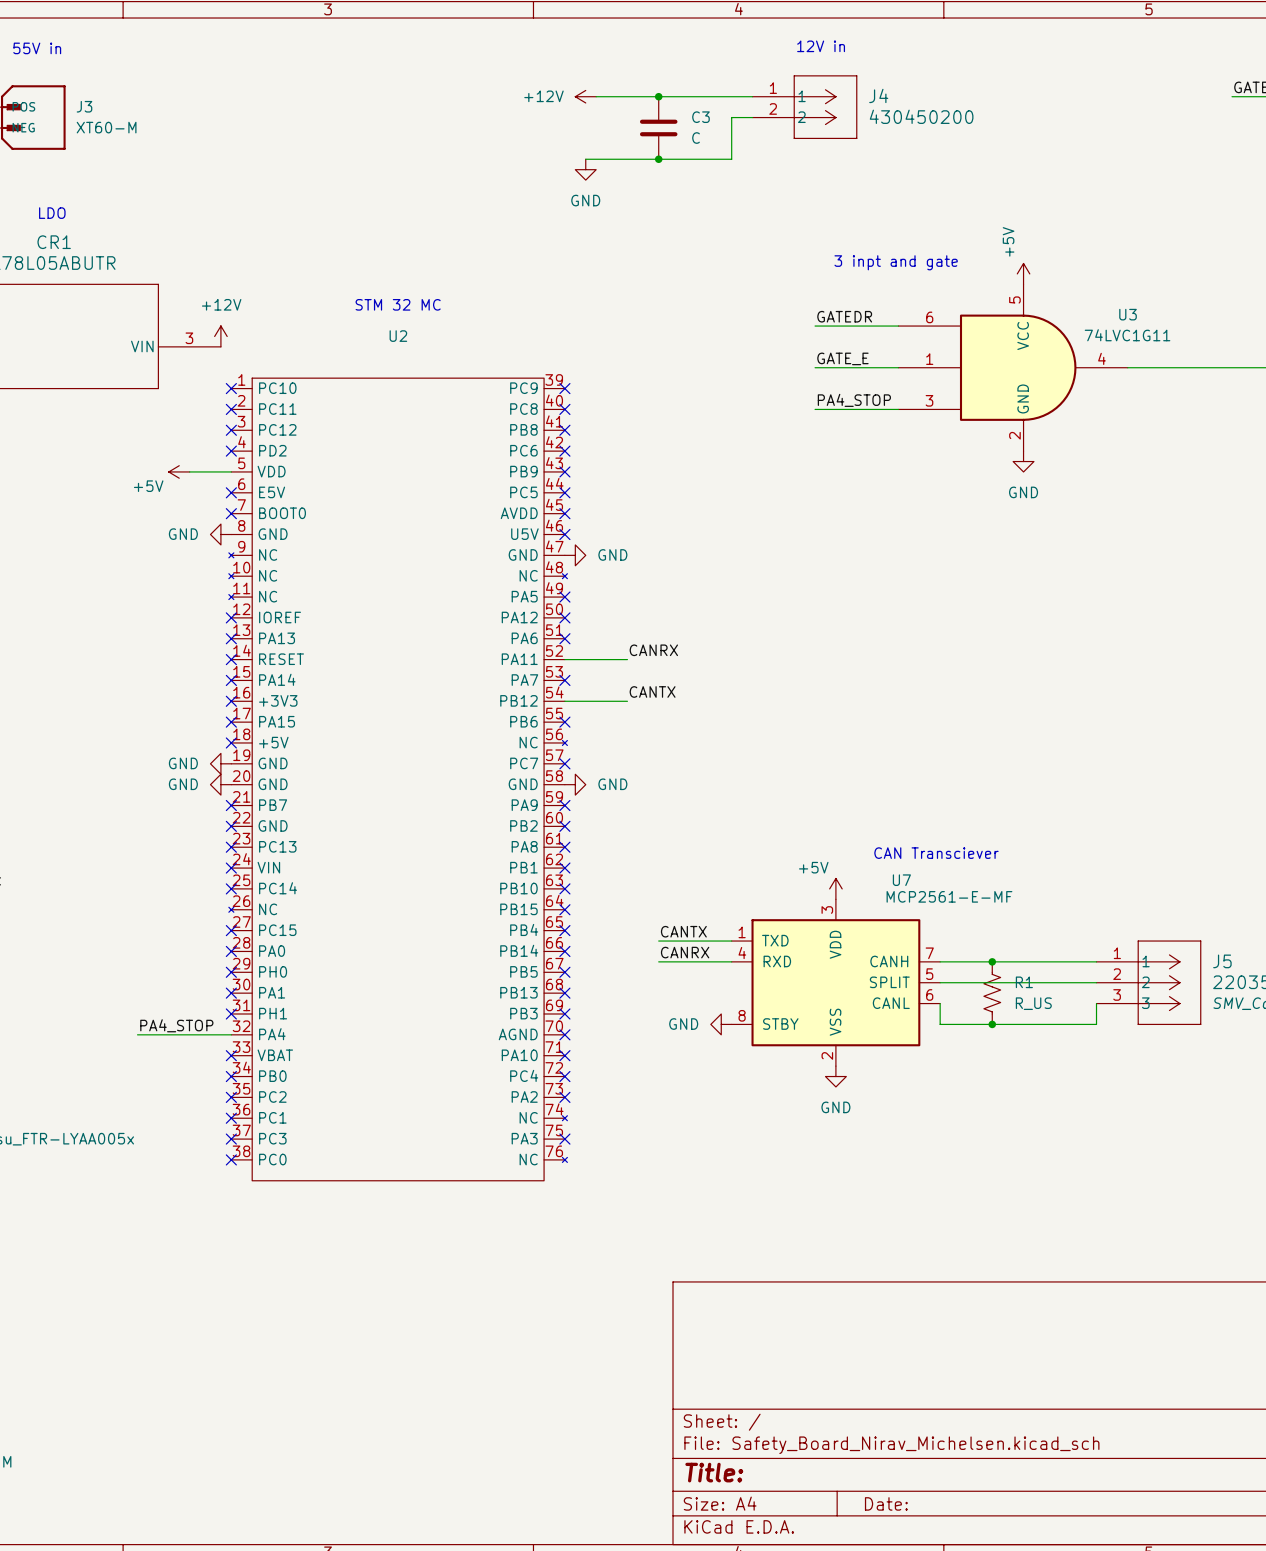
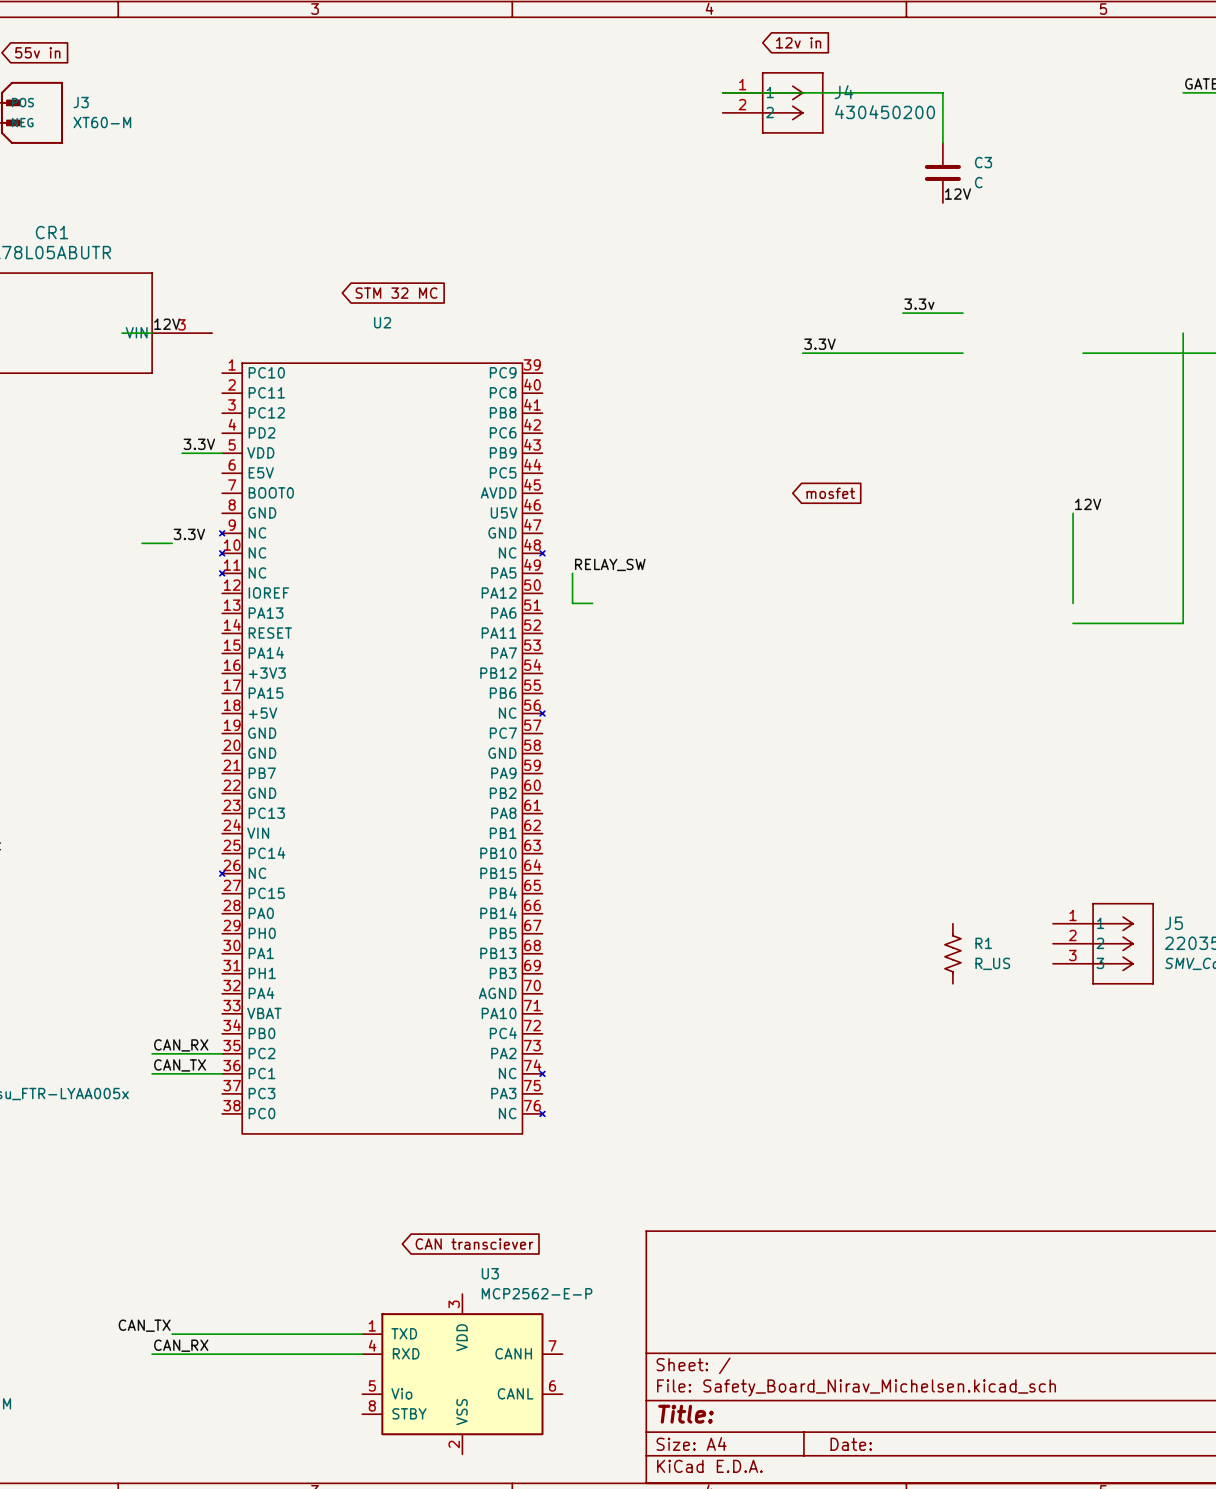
global label: none -> 12v in (798, 42)
text: 12V in (821, 46) -> none
text: 55V in (37, 48) -> none
global label: none -> 55v in (37, 52)
power symbol: +12V (585, 96) -> none
wire: (596, 96) (752, 96) -> (942, 142) (942, 92) (722, 92)
junction: (658, 96) -> none
wire: (752, 117) (731, 117) (731, 159) (585, 159) -> none
C3 position: (658, 127) -> (942, 172)
junction: (658, 159) -> none
power symbol: GND (585, 169) -> none
label: none -> 12V (958, 194)
text: LDO (52, 213) -> none
text: 3 inpt and gate (896, 262) -> none
power symbol: +5V (1023, 273) -> none
U3 symbol: [898, 284, 1128, 452] -> [362, 1294, 563, 1455]
text: STM 32 MC (398, 304) -> none
global label: none -> STM 32 MC (396, 293)
U3 name position: U3 (1128, 314) -> U3 (490, 1273)
label: GATEDR (844, 316) -> none
label: none -> 3.3v (919, 304)
wire: (815, 326) (898, 326) -> none
U3 value: 74LVC1G11 (1127, 335) -> MCP2562-E-P (537, 1293)
power symbol: +12V (220, 336) -> none
label: none -> 12V (167, 324)
wire: none -> (122, 333) (152, 333)
wire: none -> (1183, 333) (1183, 623) (1073, 623)
label: GATE_E (842, 358) -> none
label: none -> 3.3V (820, 344)
wire: (815, 367) (835, 367) -> none
no-connect mark: (231, 388) -> none
no-connect mark: (564, 388) -> none
label: PA4_STOP (854, 400) -> none
no-connect mark: (231, 409) -> none
no-connect mark: (564, 409) -> none
wire: (815, 409) (898, 409) -> none
no-connect mark: (231, 430) -> none
no-connect mark: (564, 430) -> none
no-connect mark: (231, 451) -> none
no-connect mark: (564, 451) -> none
power symbol: GND (1023, 461) -> none
label: none -> 3.3V (199, 444)
power symbol: +5V (179, 471) -> none
no-connect mark: (564, 471) -> none
no-connect mark: (231, 492) -> none
no-connect mark: (564, 492) -> none
no-connect mark: (231, 513) -> none
no-connect mark: (564, 513) -> none
global label: none -> mosfet (830, 493)
label: none -> 12V (1088, 504)
power symbol: GND (220, 534) -> none
no-connect mark: (564, 534) -> none
wire: none -> (1073, 513) (1073, 603)
power symbol: GND (575, 555) -> none
label: none -> 3.3V (189, 534)
wire: none -> (142, 543) (172, 543)
label: none -> RELAY_SW (610, 564)
no-connect mark: (564, 597) -> none
wire: none -> (572, 573) (572, 603) (592, 603)
no-connect mark: (231, 617) -> none
no-connect mark: (564, 617) -> none
no-connect mark: (231, 638) -> none
no-connect mark: (564, 638) -> none
label: CANRX (653, 650) -> none
no-connect mark: (231, 659) -> none
wire: (564, 659) (627, 659) -> none
no-connect mark: (231, 680) -> none
no-connect mark: (564, 680) -> none
label: CANTX (652, 691) -> none
no-connect mark: (231, 701) -> none
wire: (564, 701) (627, 701) -> none
no-connect mark: (231, 722) -> none
no-connect mark: (564, 722) -> none
no-connect mark: (231, 742) -> none
power symbol: GND (220, 763) -> none
no-connect mark: (564, 763) -> none
power symbol: GND (220, 784) -> none
power symbol: GND (575, 784) -> none
no-connect mark: (231, 805) -> none
no-connect mark: (564, 805) -> none
no-connect mark: (231, 826) -> none
no-connect mark: (564, 826) -> none
no-connect mark: (231, 847) -> none
no-connect mark: (564, 847) -> none
text: CAN Transciever (936, 853) -> none
no-connect mark: (231, 868) -> none
no-connect mark: (564, 868) -> none
no-connect mark: (231, 888) -> none
no-connect mark: (564, 888) -> none
power symbol: +5V (835, 888) -> none
no-connect mark: (564, 909) -> none
no-connect mark: (231, 930) -> none
no-connect mark: (564, 930) -> none
label: CANTX (683, 931) -> none
wire: (658, 941) (731, 941) -> none
no-connect mark: (231, 951) -> none
no-connect mark: (564, 951) -> none
label: CANRX (685, 952) -> none
wire: (658, 961) (731, 961) -> none
wire: (940, 961) (1096, 961) -> none
junction: (992, 961) -> none
no-connect mark: (231, 972) -> none
no-connect mark: (564, 972) -> none
U7: MCP2561-E-MF (835, 982) -> none
wire: (940, 982) (1096, 982) -> none
no-connect mark: (231, 993) -> none
no-connect mark: (564, 993) -> none
wire: (940, 1003) (940, 1024) (1096, 1024) (1096, 1003) -> none
no-connect mark: (231, 1013) -> none
no-connect mark: (564, 1013) -> none
power symbol: GND (721, 1024) -> none
junction: (992, 1024) -> none
label: PA4_STOP (176, 1025) -> none
wire: (137, 1034) (231, 1034) -> none
no-connect mark: (564, 1034) -> none
no-connect mark: (231, 1055) -> none
no-connect mark: (564, 1055) -> none
no-connect mark: (231, 1076) -> none
no-connect mark: (564, 1076) -> none
power symbol: GND (835, 1076) -> none
label: none -> CAN_RX (181, 1045)
wire: none -> (152, 1053) (222, 1053)
no-connect mark: (231, 1097) -> none
no-connect mark: (564, 1097) -> none
label: none -> CAN_TX (180, 1065)
wire: none -> (152, 1073) (222, 1073)
no-connect mark: (231, 1118) -> none
no-connect mark: (231, 1139) -> none
no-connect mark: (564, 1139) -> none
no-connect mark: (231, 1159) -> none
global label: none -> CAN transciever (474, 1244)
label: none -> CAN_TX (144, 1325)
wire: none -> (172, 1334) (362, 1334)
label: none -> CAN_RX (181, 1345)
wire: none -> (152, 1354) (362, 1354)

